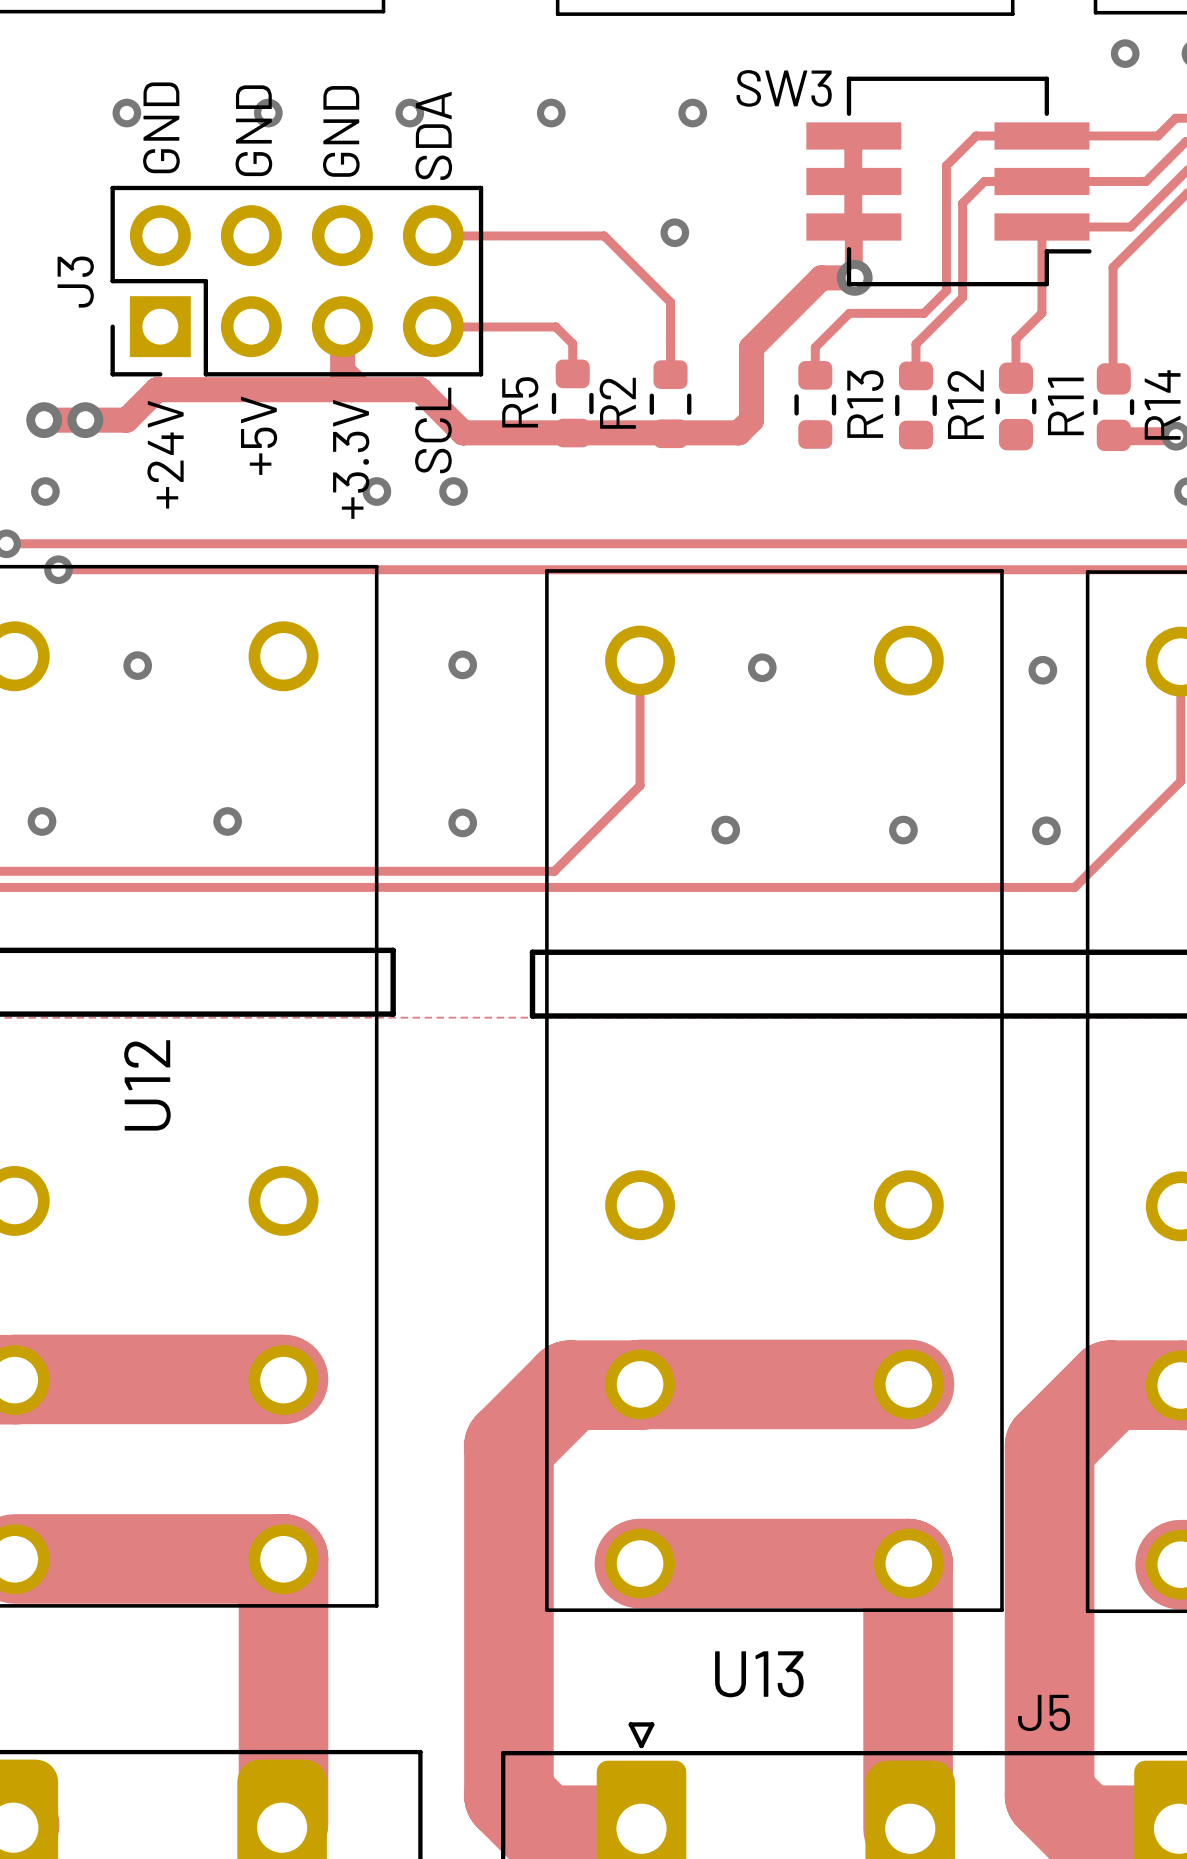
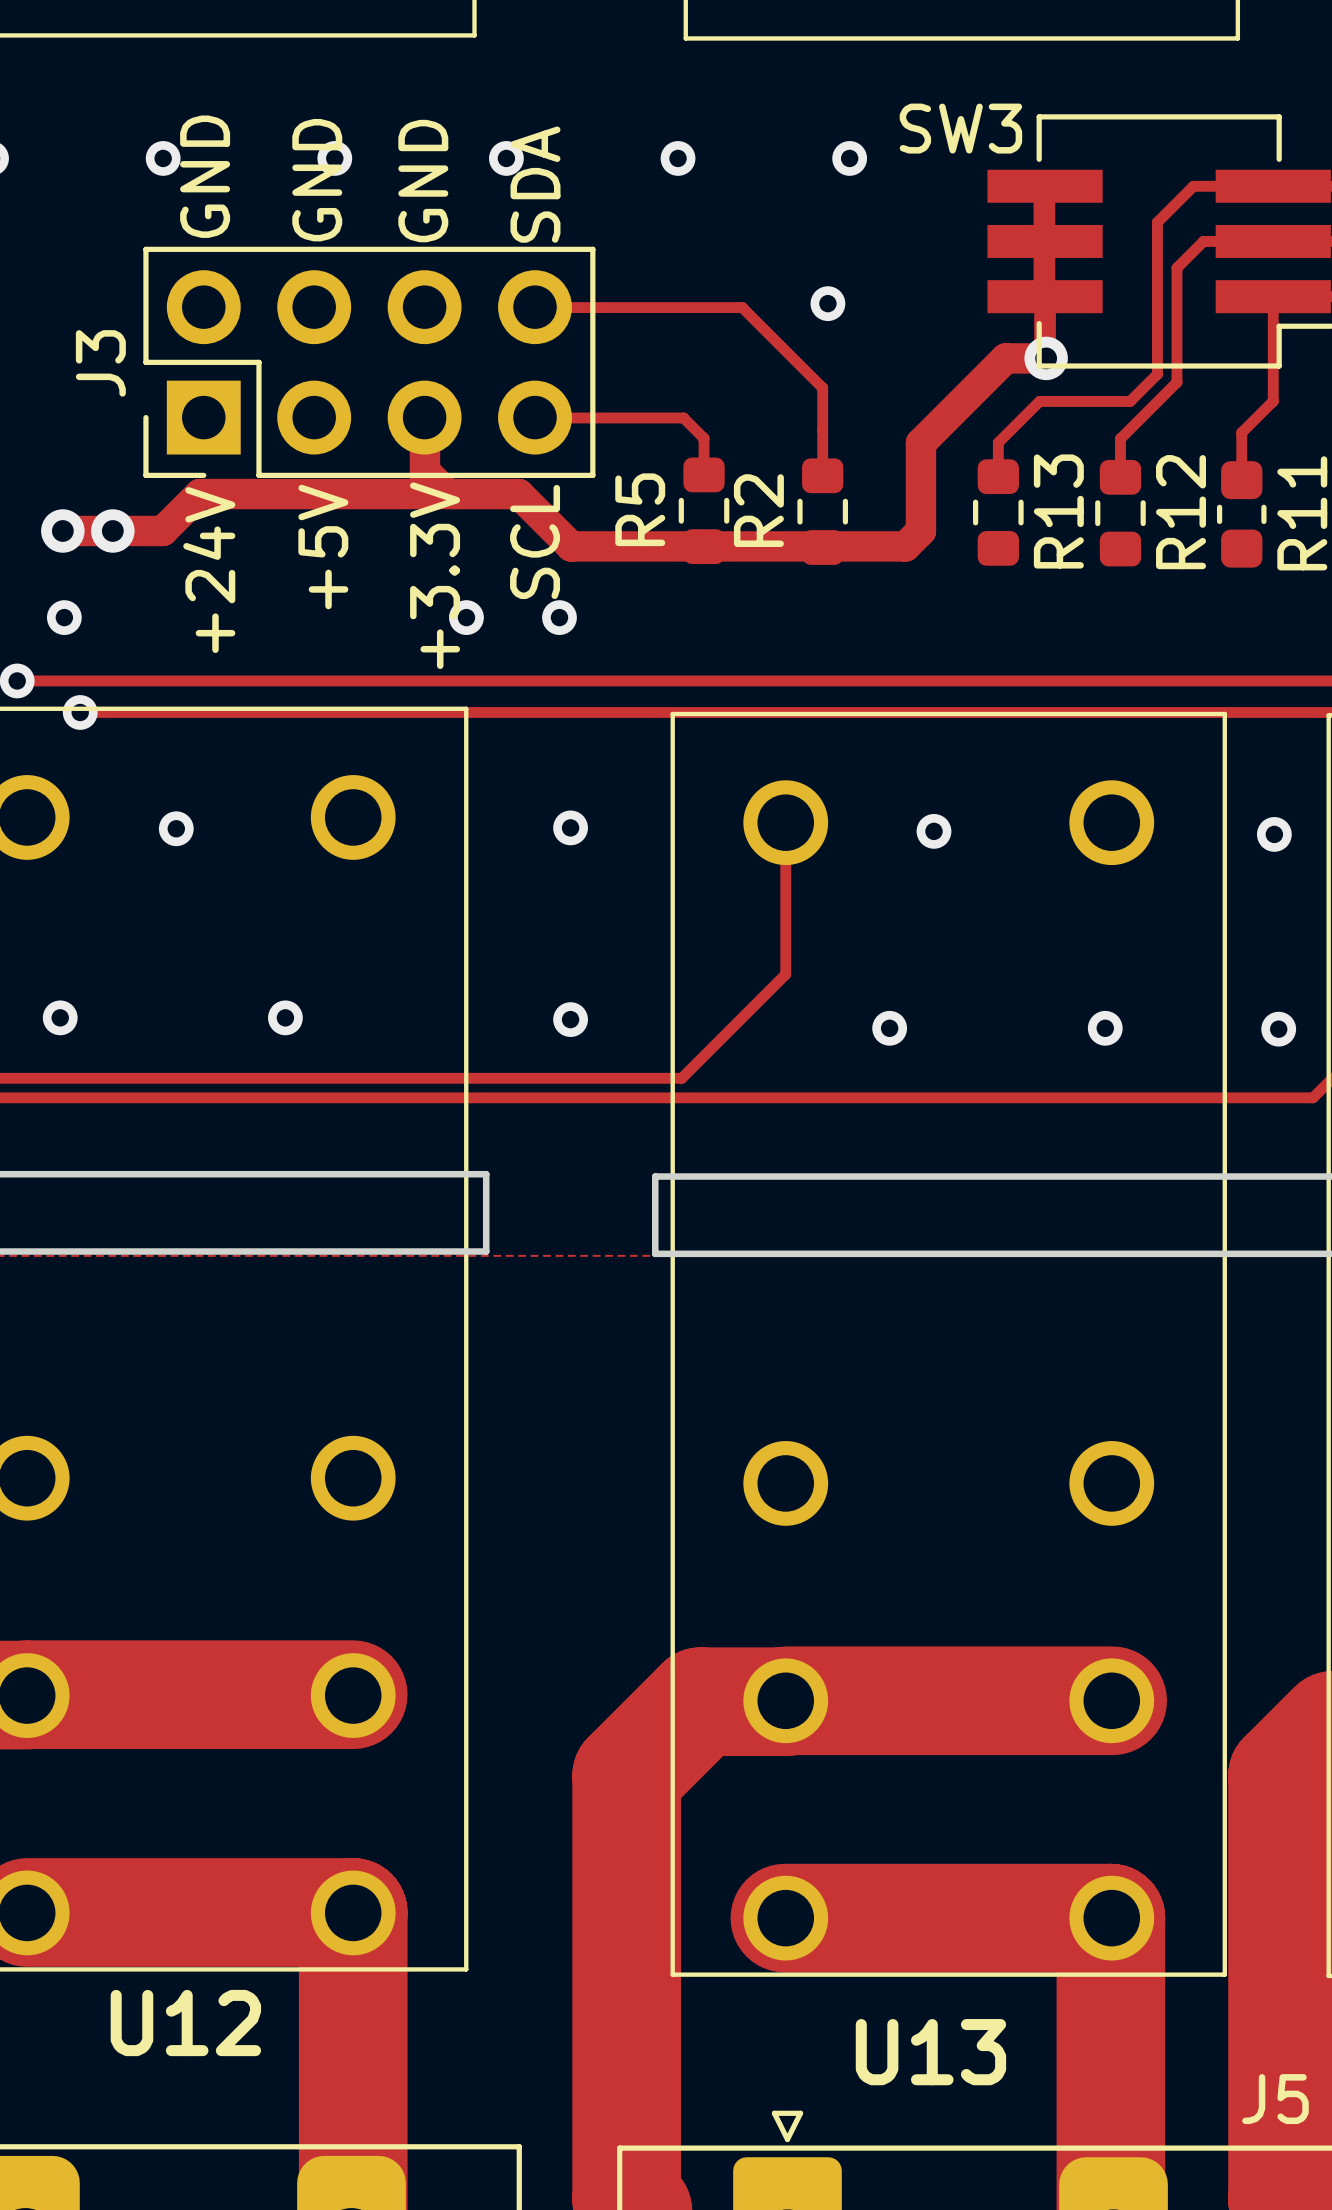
U12 name rotation: 0° (147, 1085) -> 90° clockwise (185, 2023)
U12 name position: U12 (147, 1085) -> U12 (185, 2023)

